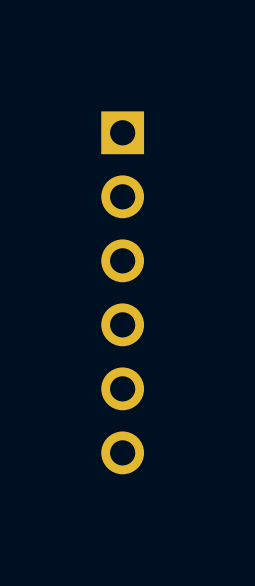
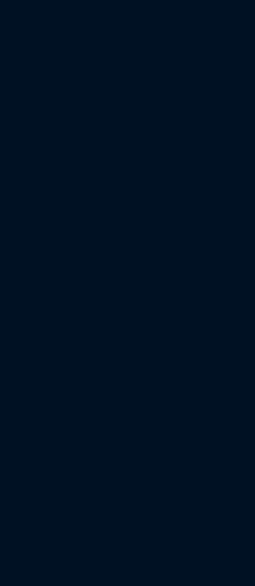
part: (122, 292) -> none

